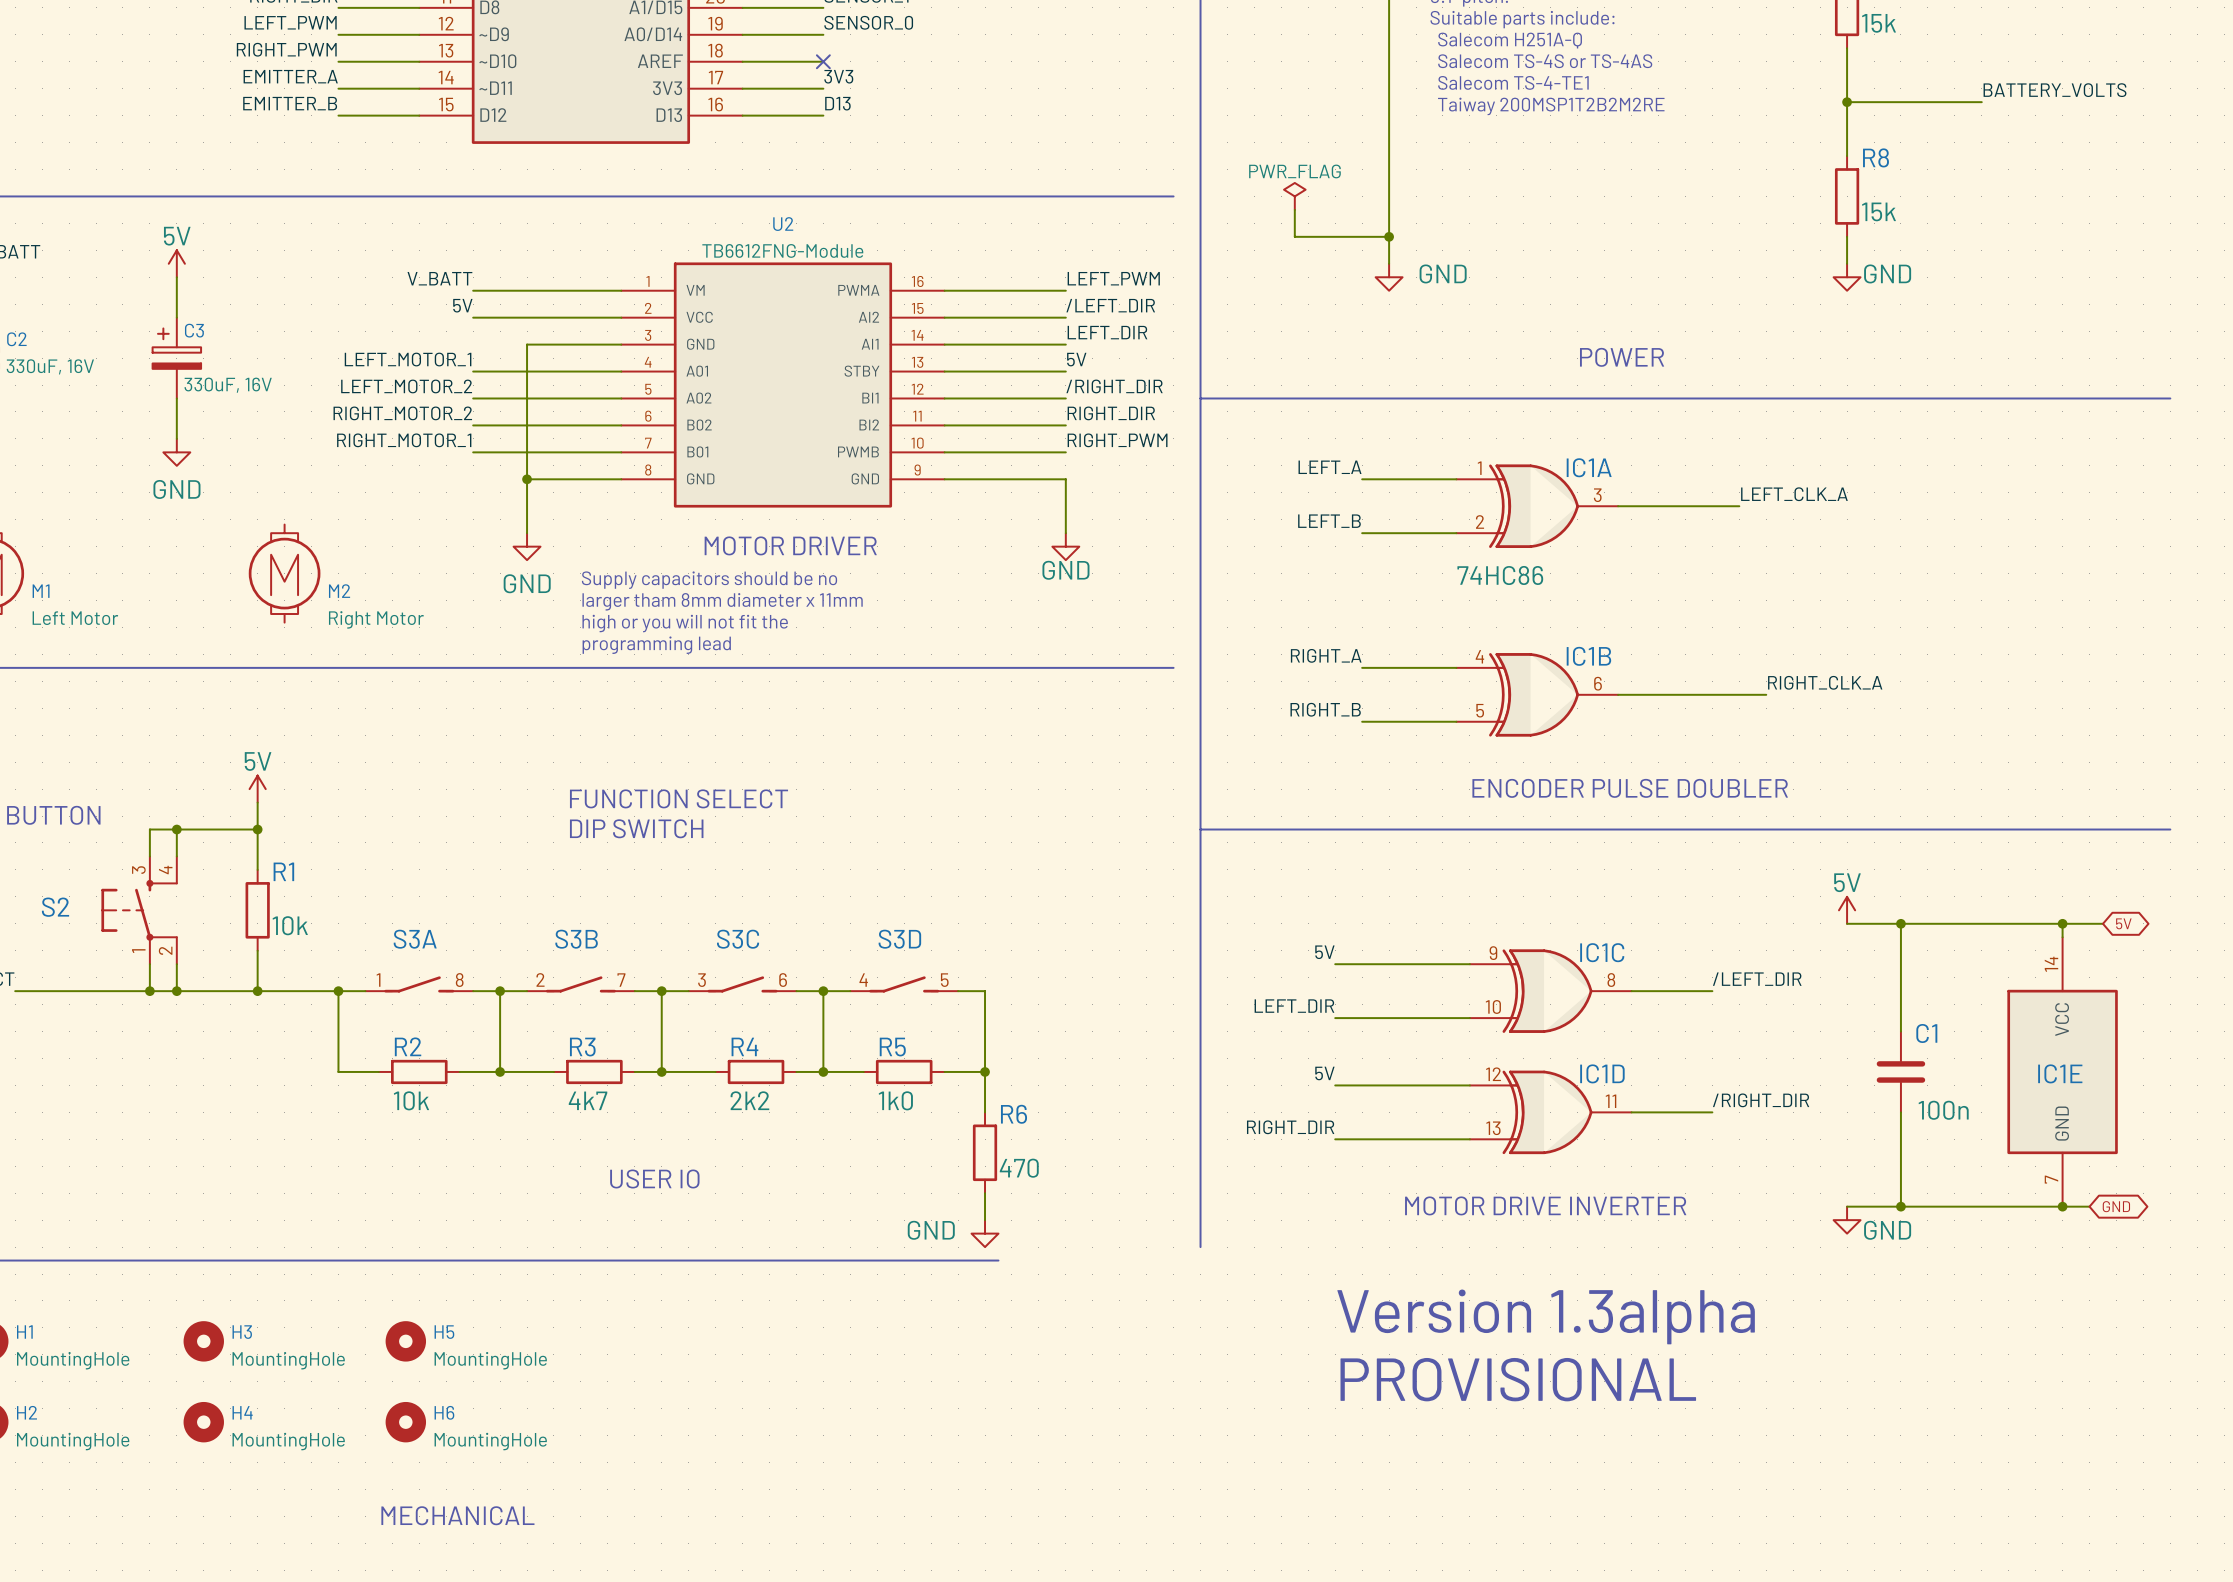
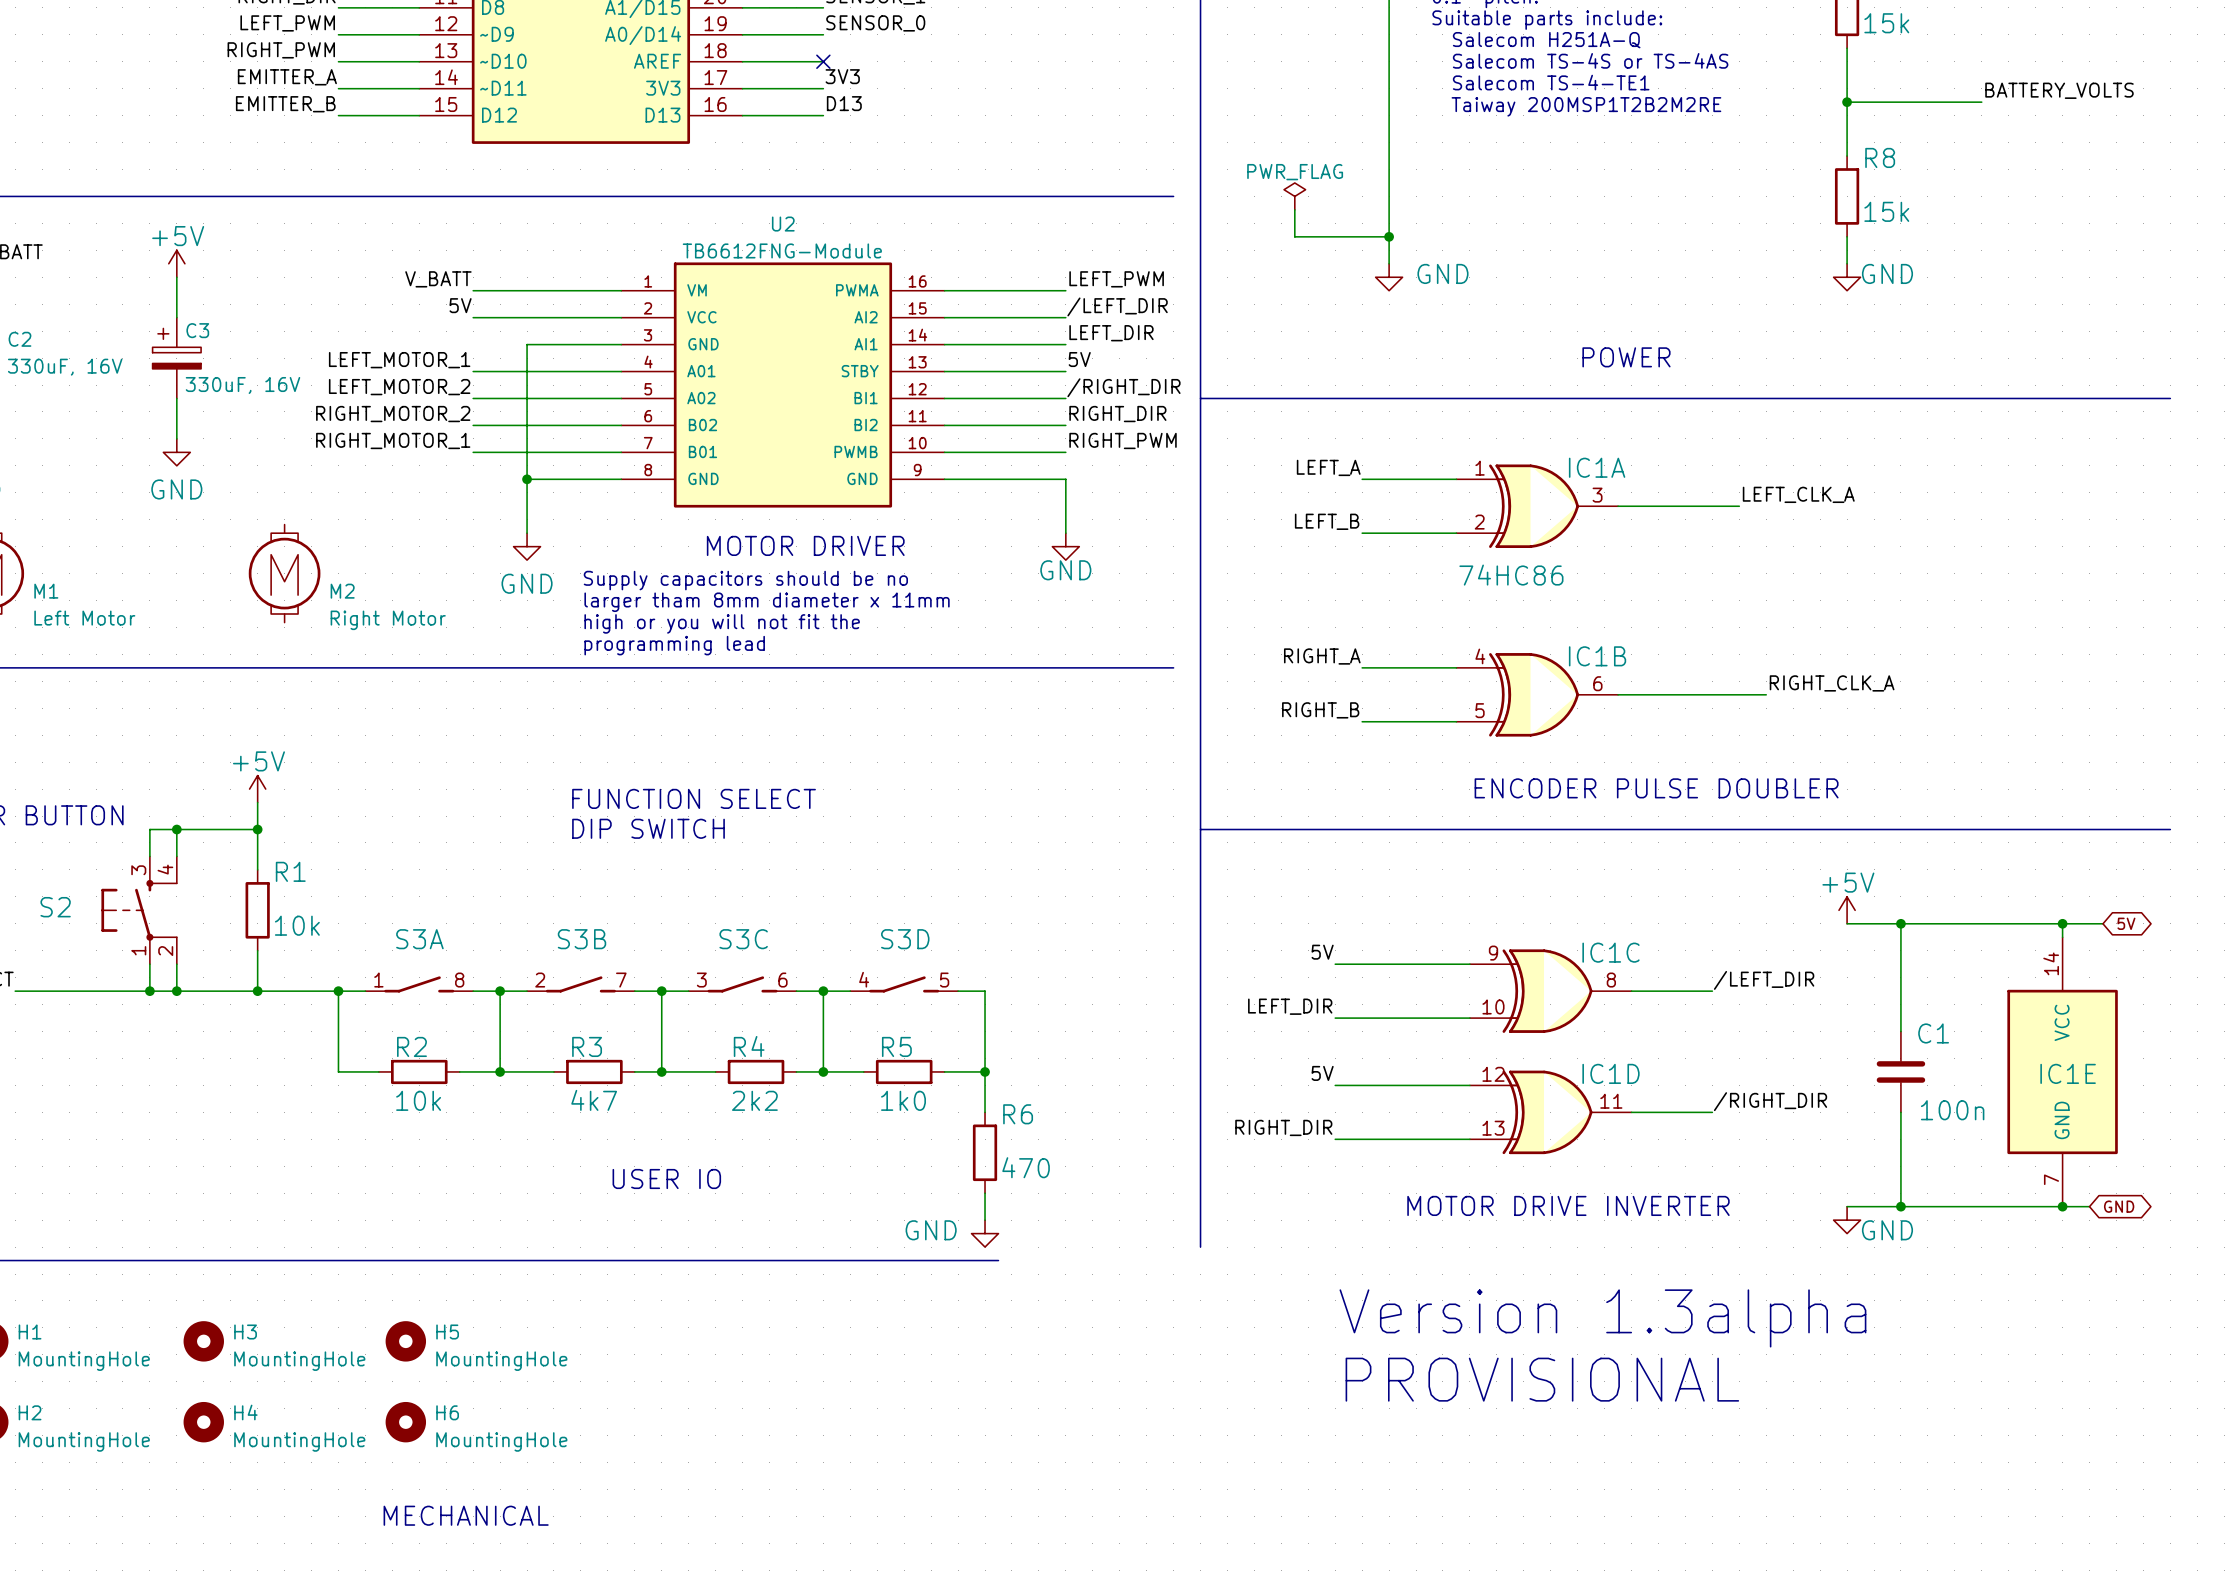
power symbol: 5V (176, 263) -> +5V (176, 263)
power symbol: 5V (257, 789) -> +5V (257, 789)
power symbol: 5V (1847, 910) -> +5V (1847, 910)

